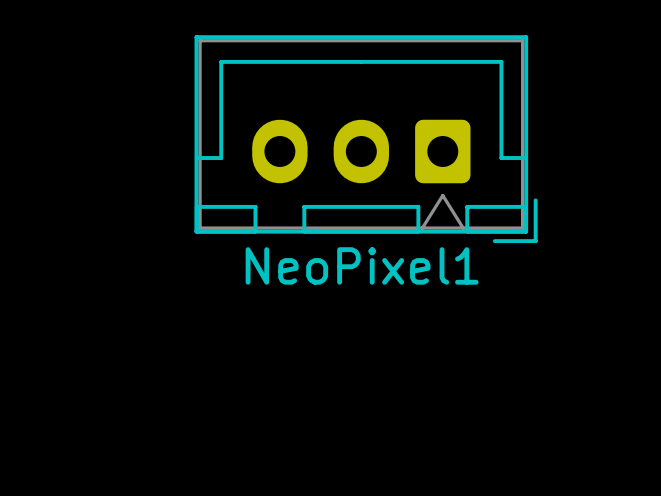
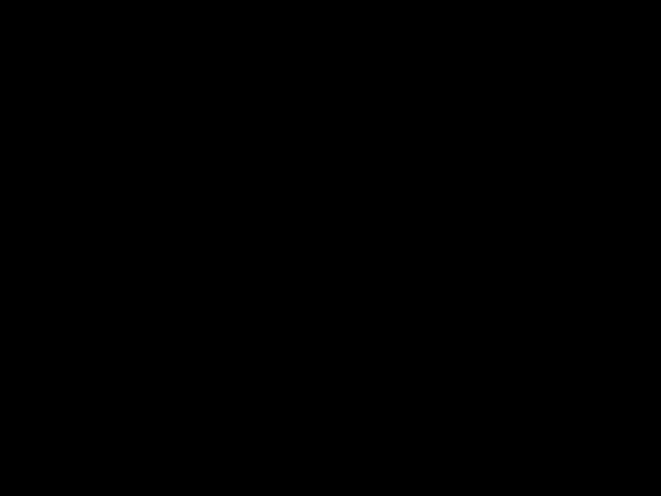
NeoPixel1: (366, 139) -> none

